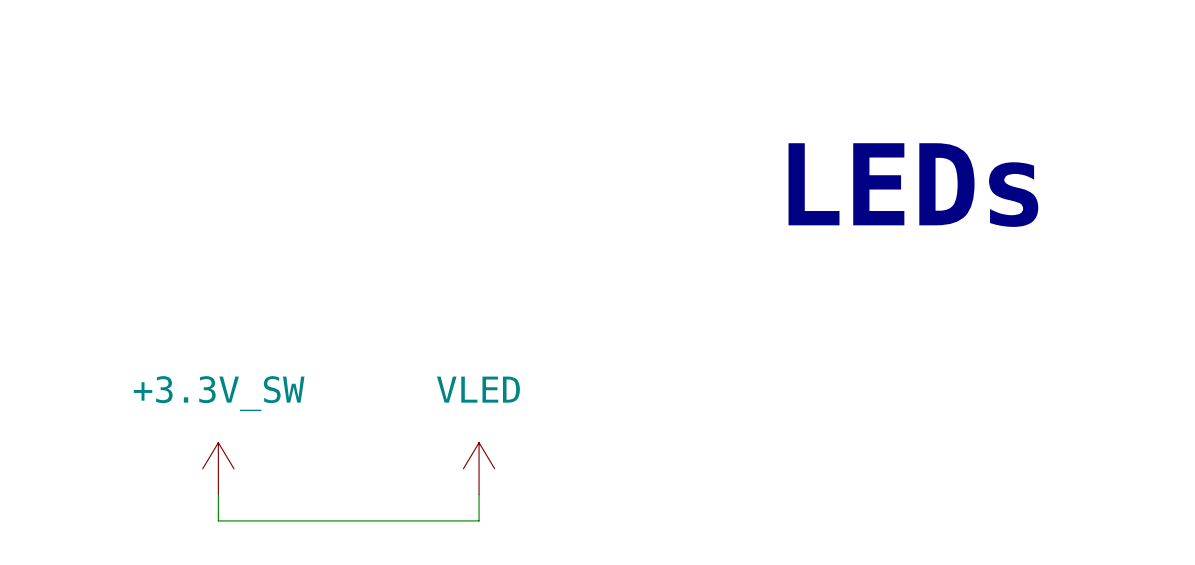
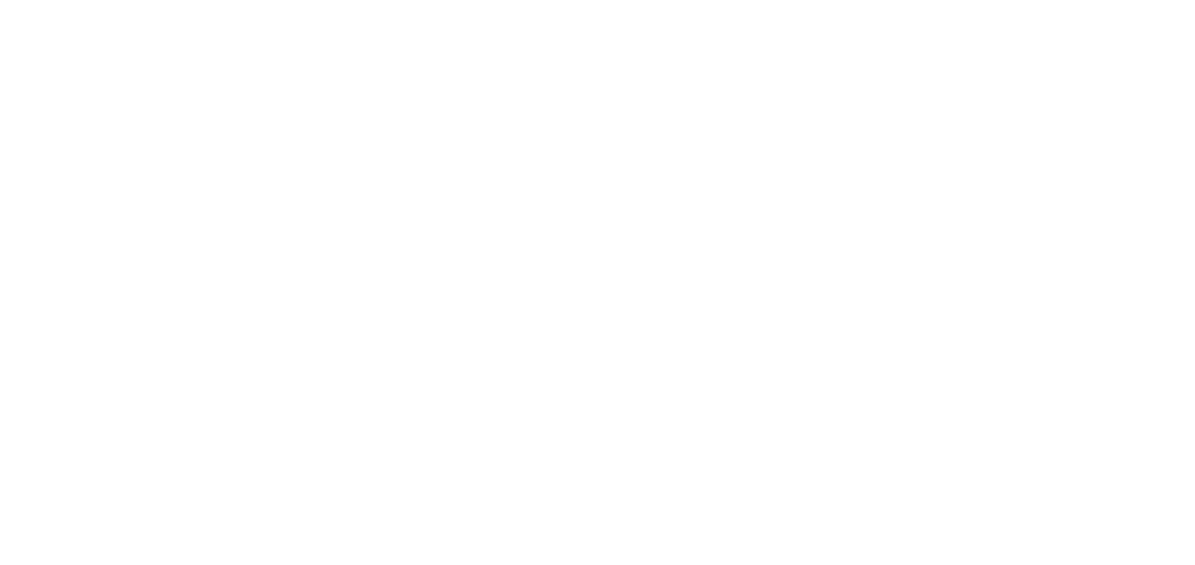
text: LEDs (913, 185) -> none
power symbol: +3.3V_SW (218, 468) -> none
power symbol: VLED (479, 468) -> none
wire: (218, 494) (218, 520) (479, 520) (479, 494) -> none

